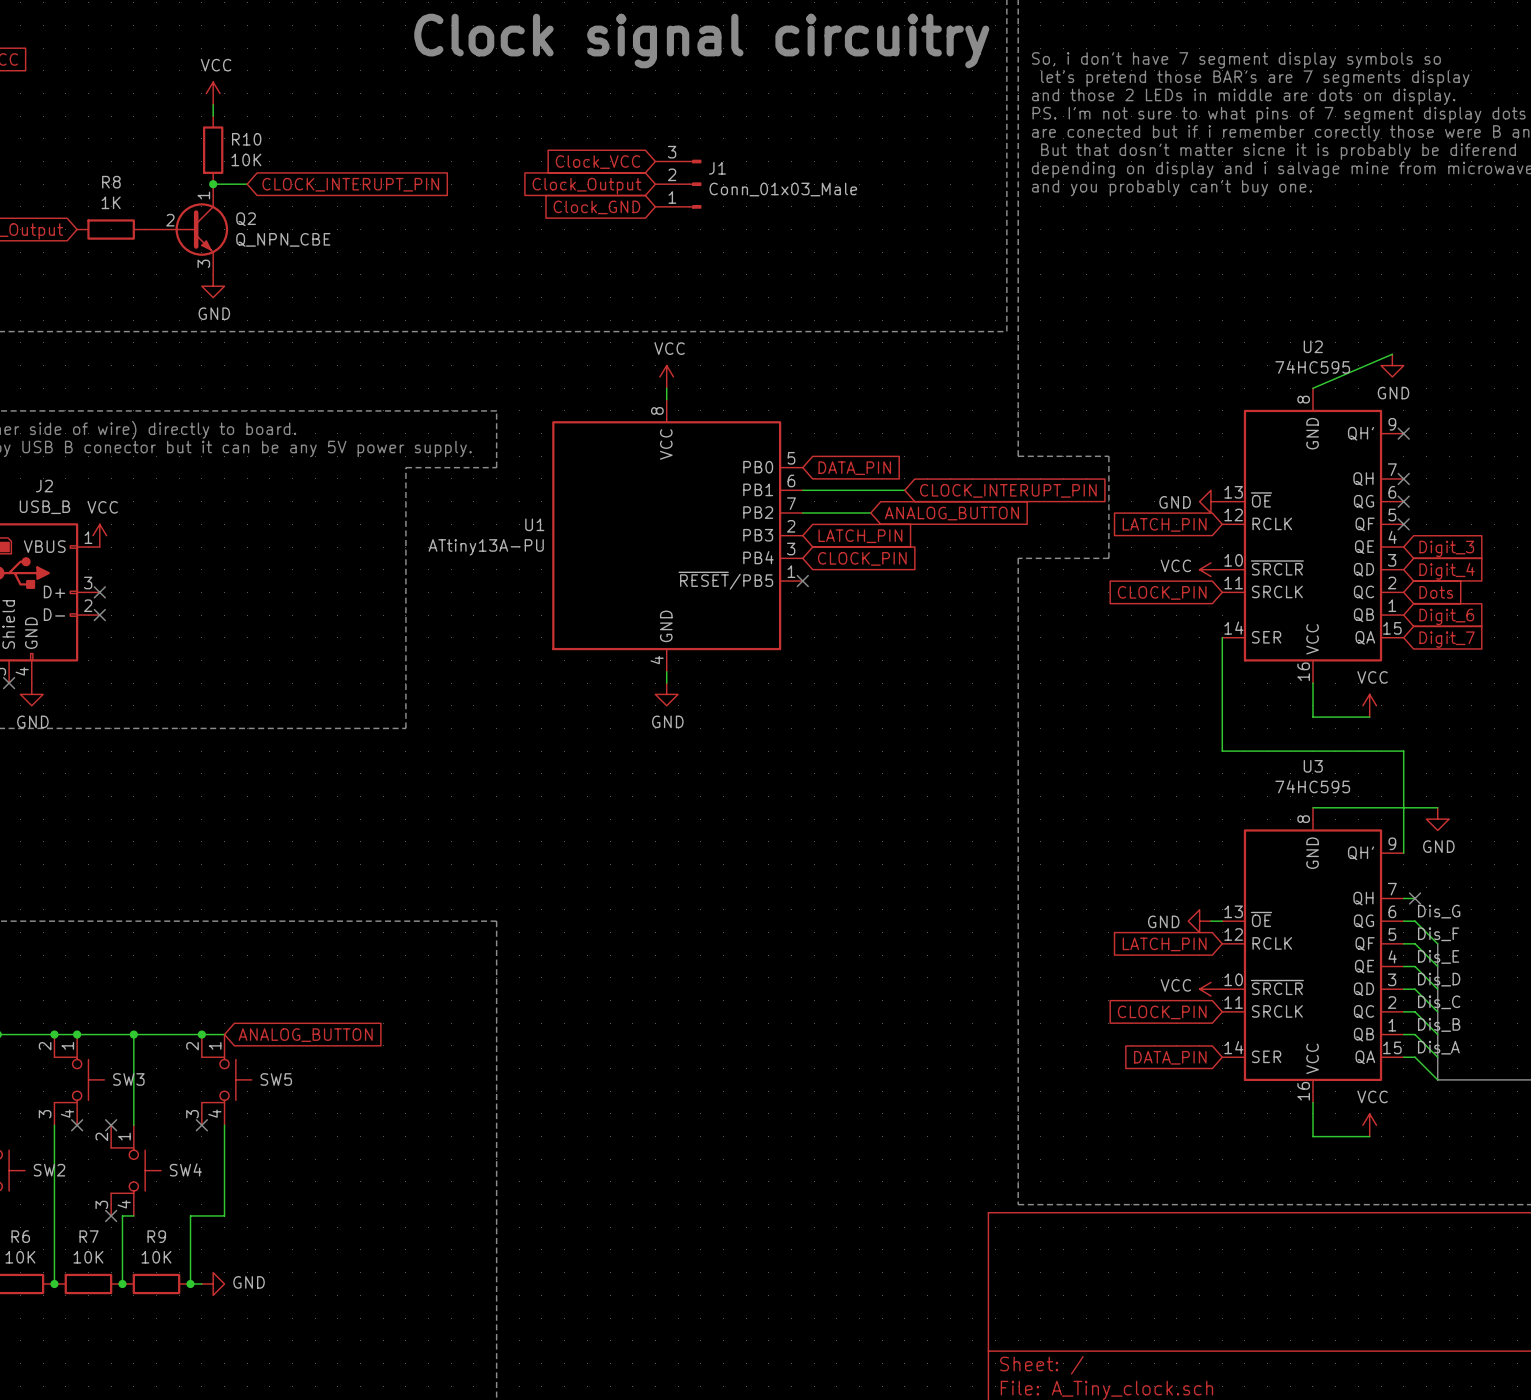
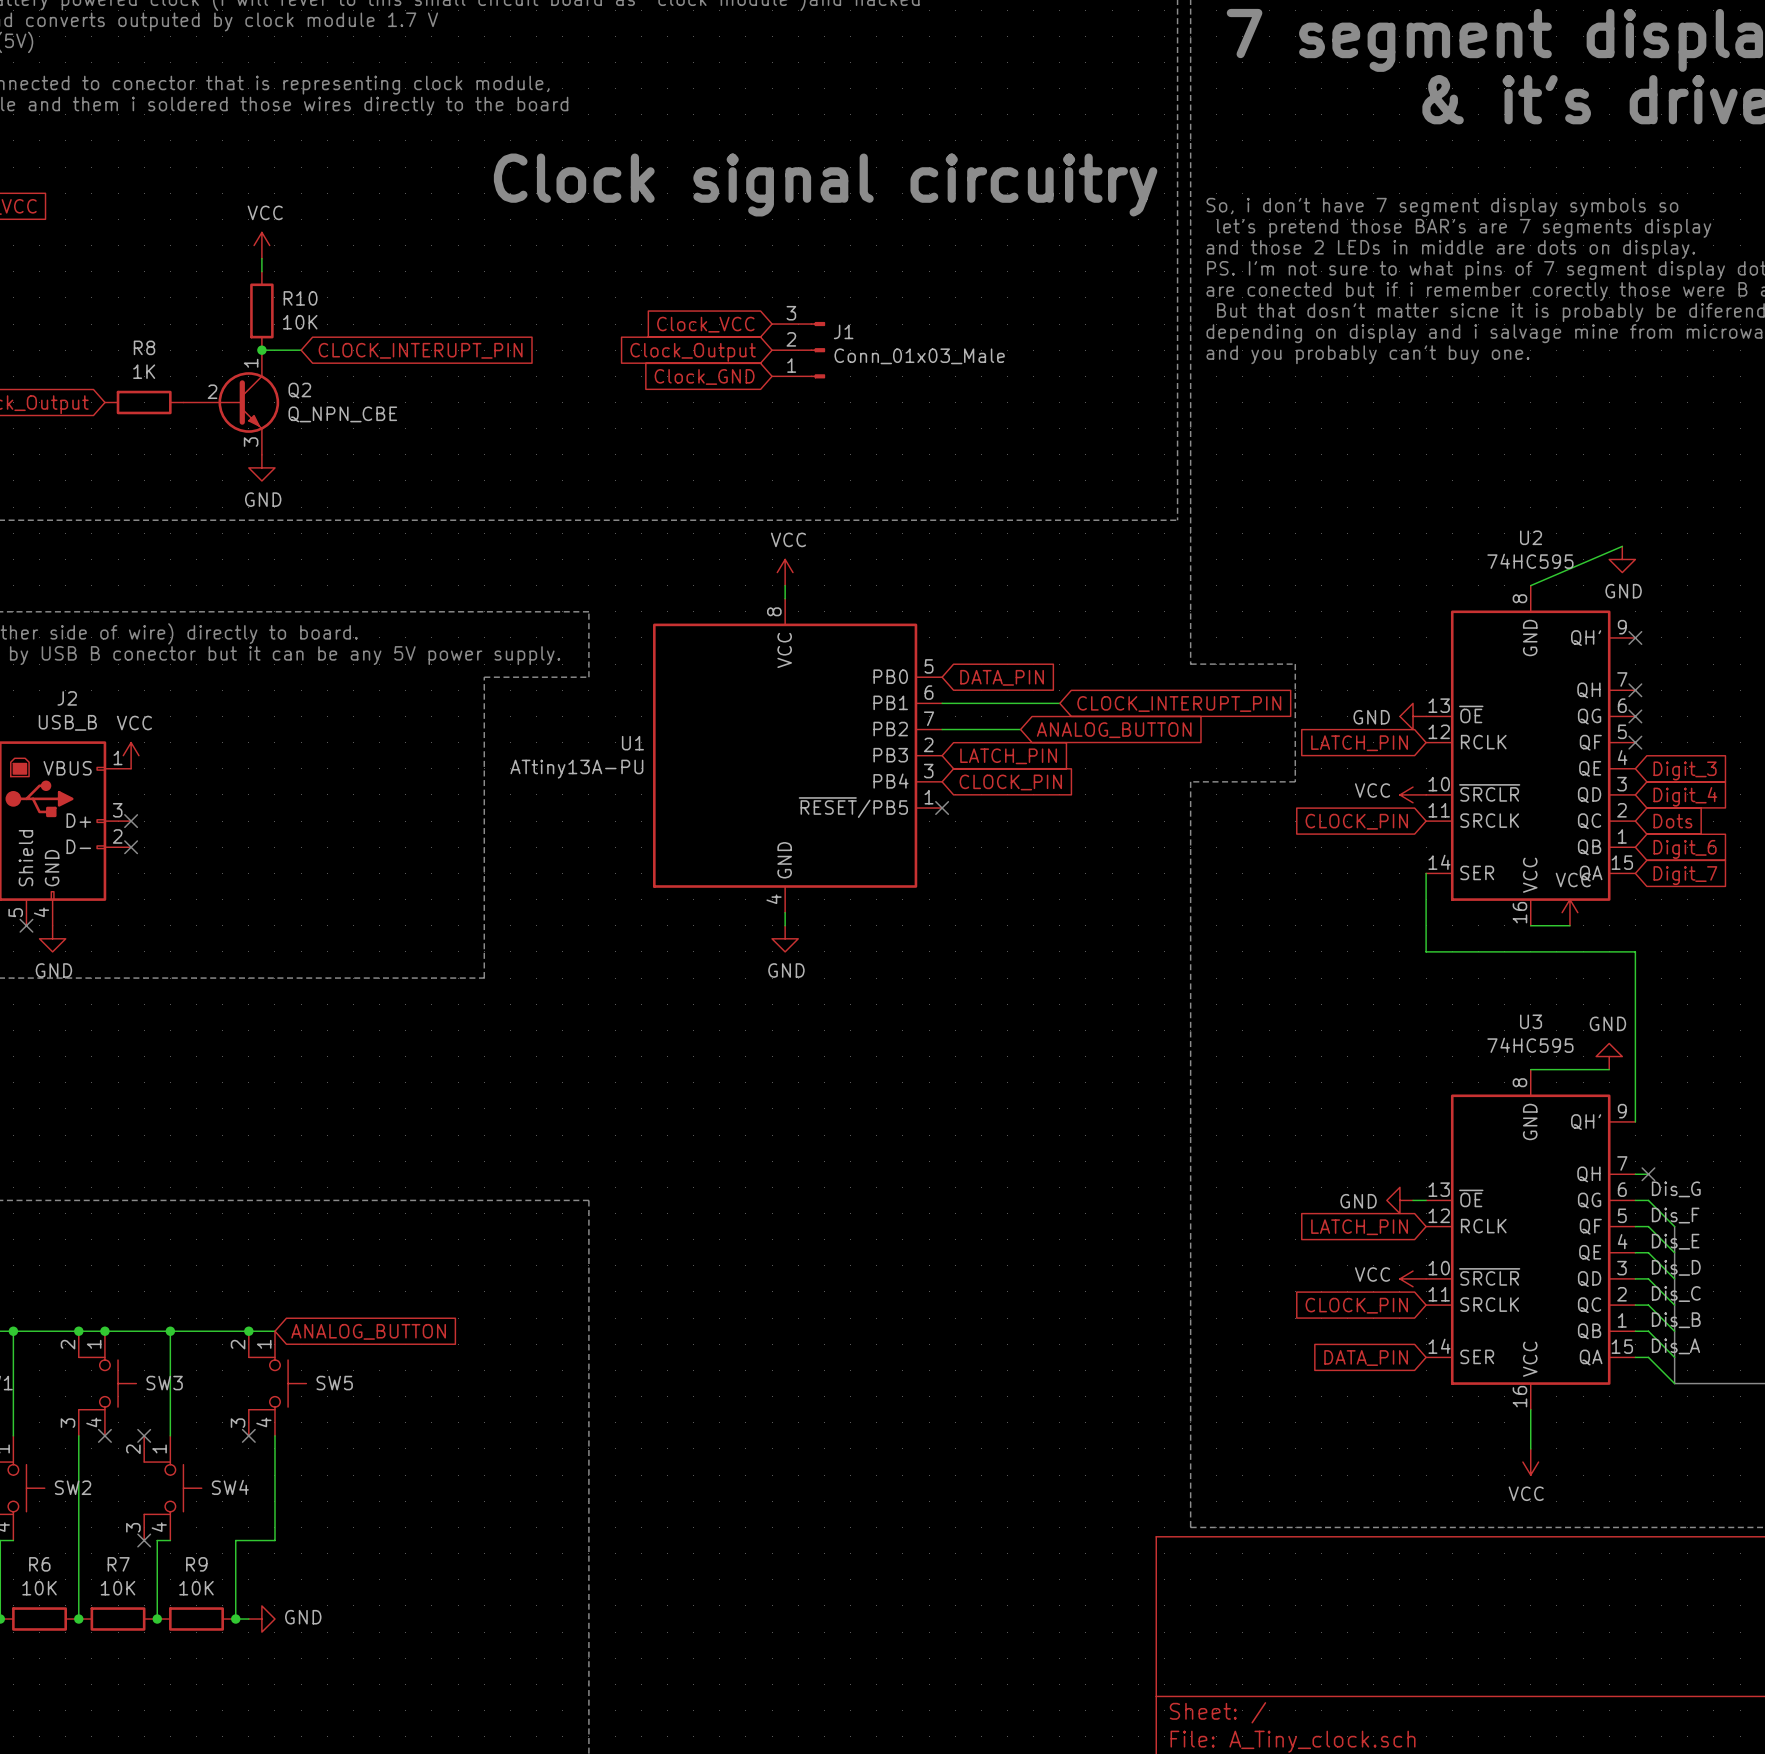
wire: (1312, 683) (1312, 717) (1369, 717) -> (1530, 925) (1569, 925)
wire: (1222, 705) (1222, 751) (1403, 751) -> (1426, 951) (1635, 951) (1635, 1004)
power symbol position: VCC (1369, 705) -> VCC (1569, 912)
wire: (1381, 807) (1437, 807) -> none
power symbol rotation: 0° (1437, 819) -> 180° (1609, 1056)
power symbol position: GND (1437, 819) -> GND (1609, 1056)
power symbol rotation: 0° (1369, 1125) -> 180° (1530, 1462)
power symbol position: VCC (1369, 1125) -> VCC (1530, 1462)
wire: (1312, 1136) (1369, 1136) -> none

